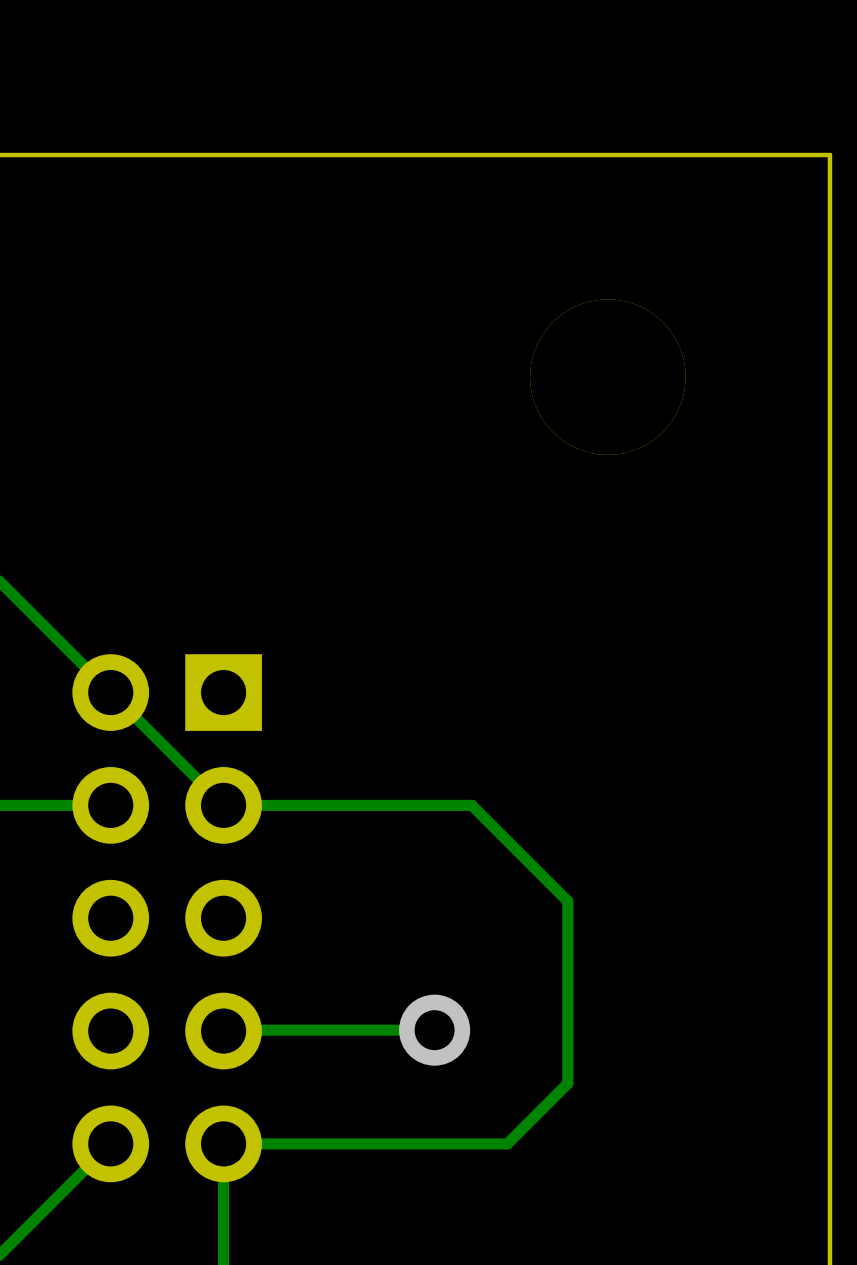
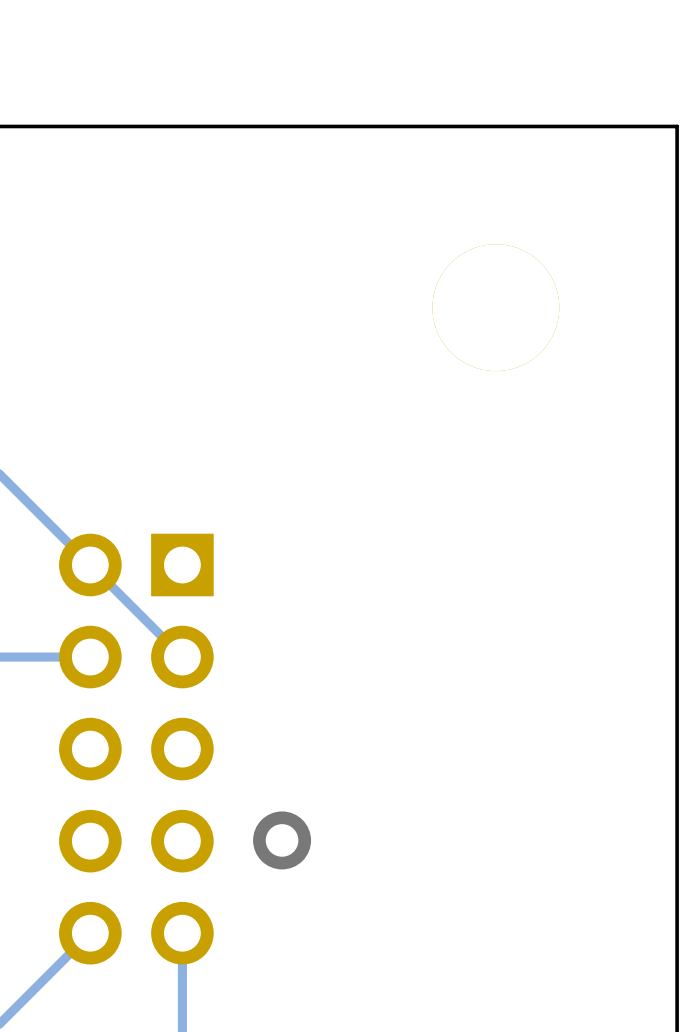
track: (247, 805) (471, 805) (567, 901) (567, 1083) (507, 1143) (223, 1143) -> none
track: (434, 1030) (223, 1031) -> none
via position: (434, 1030) -> (282, 840)

